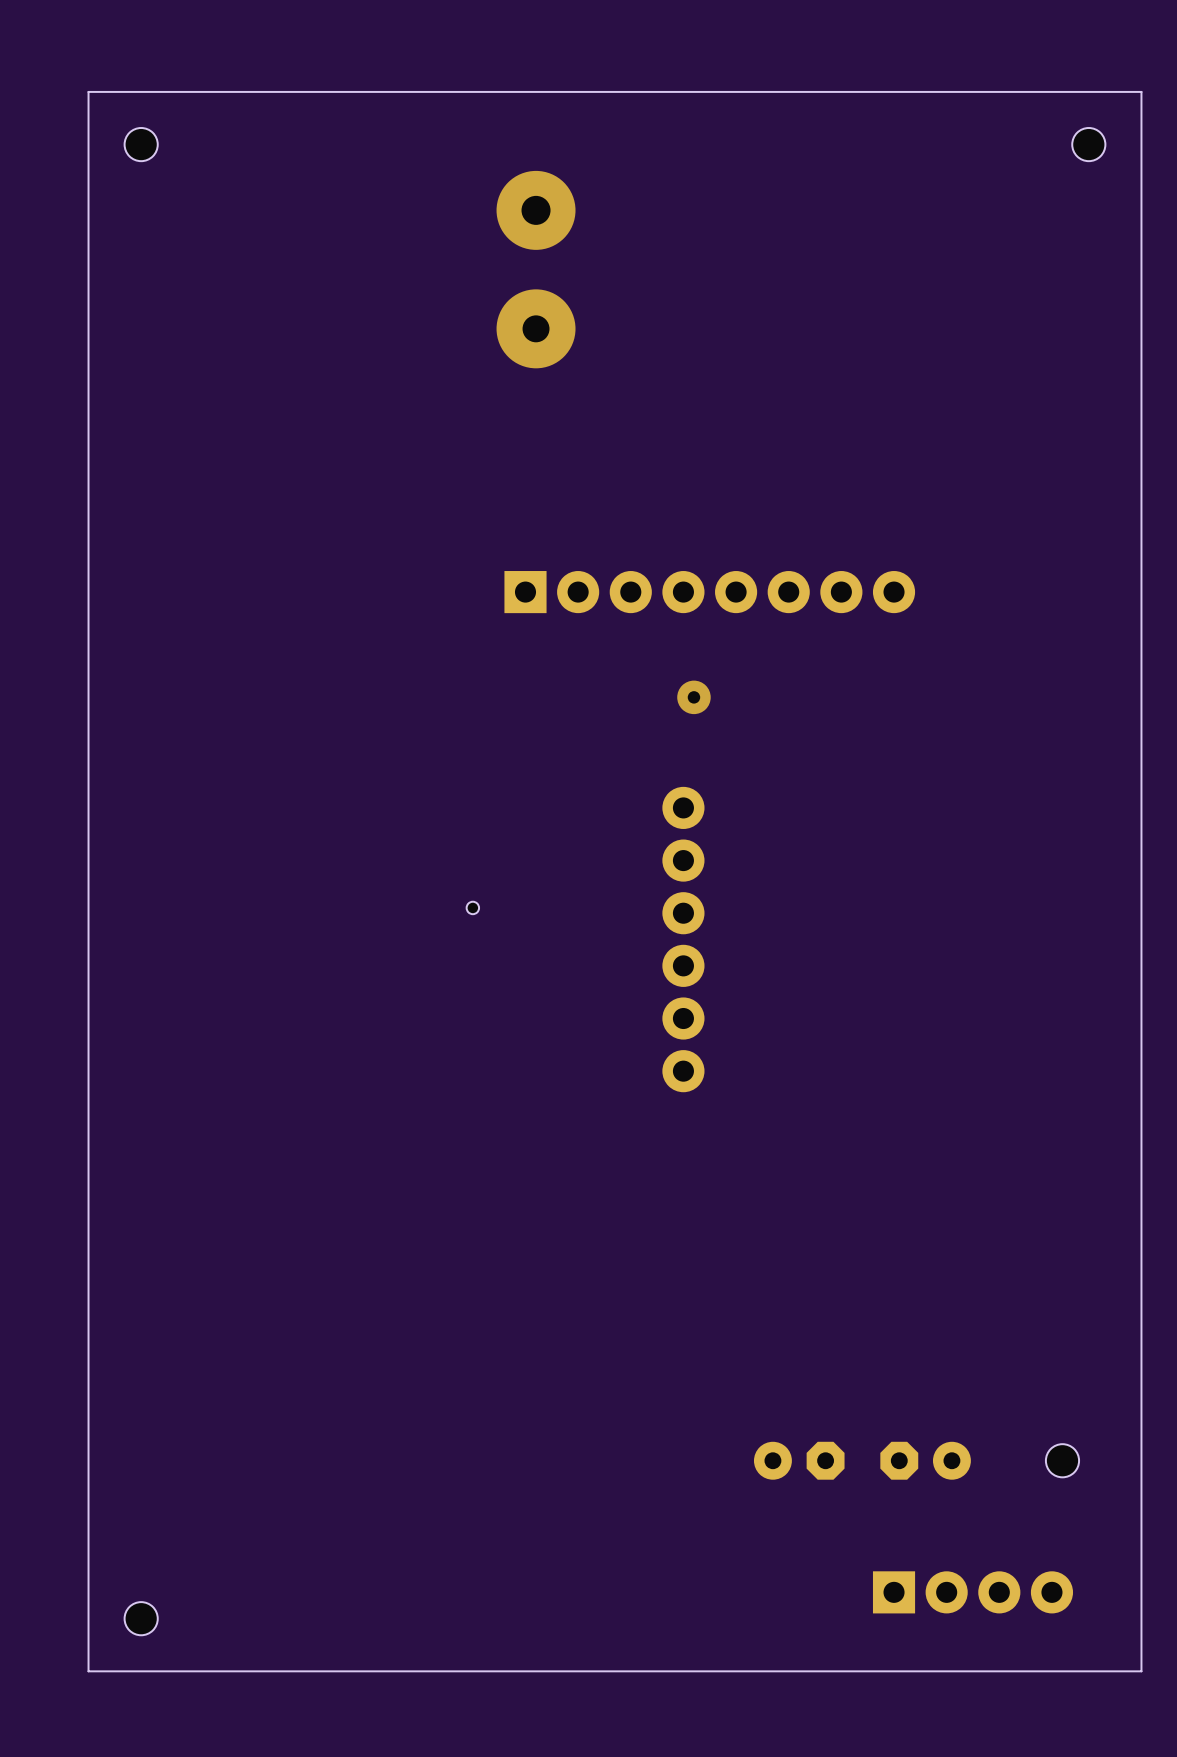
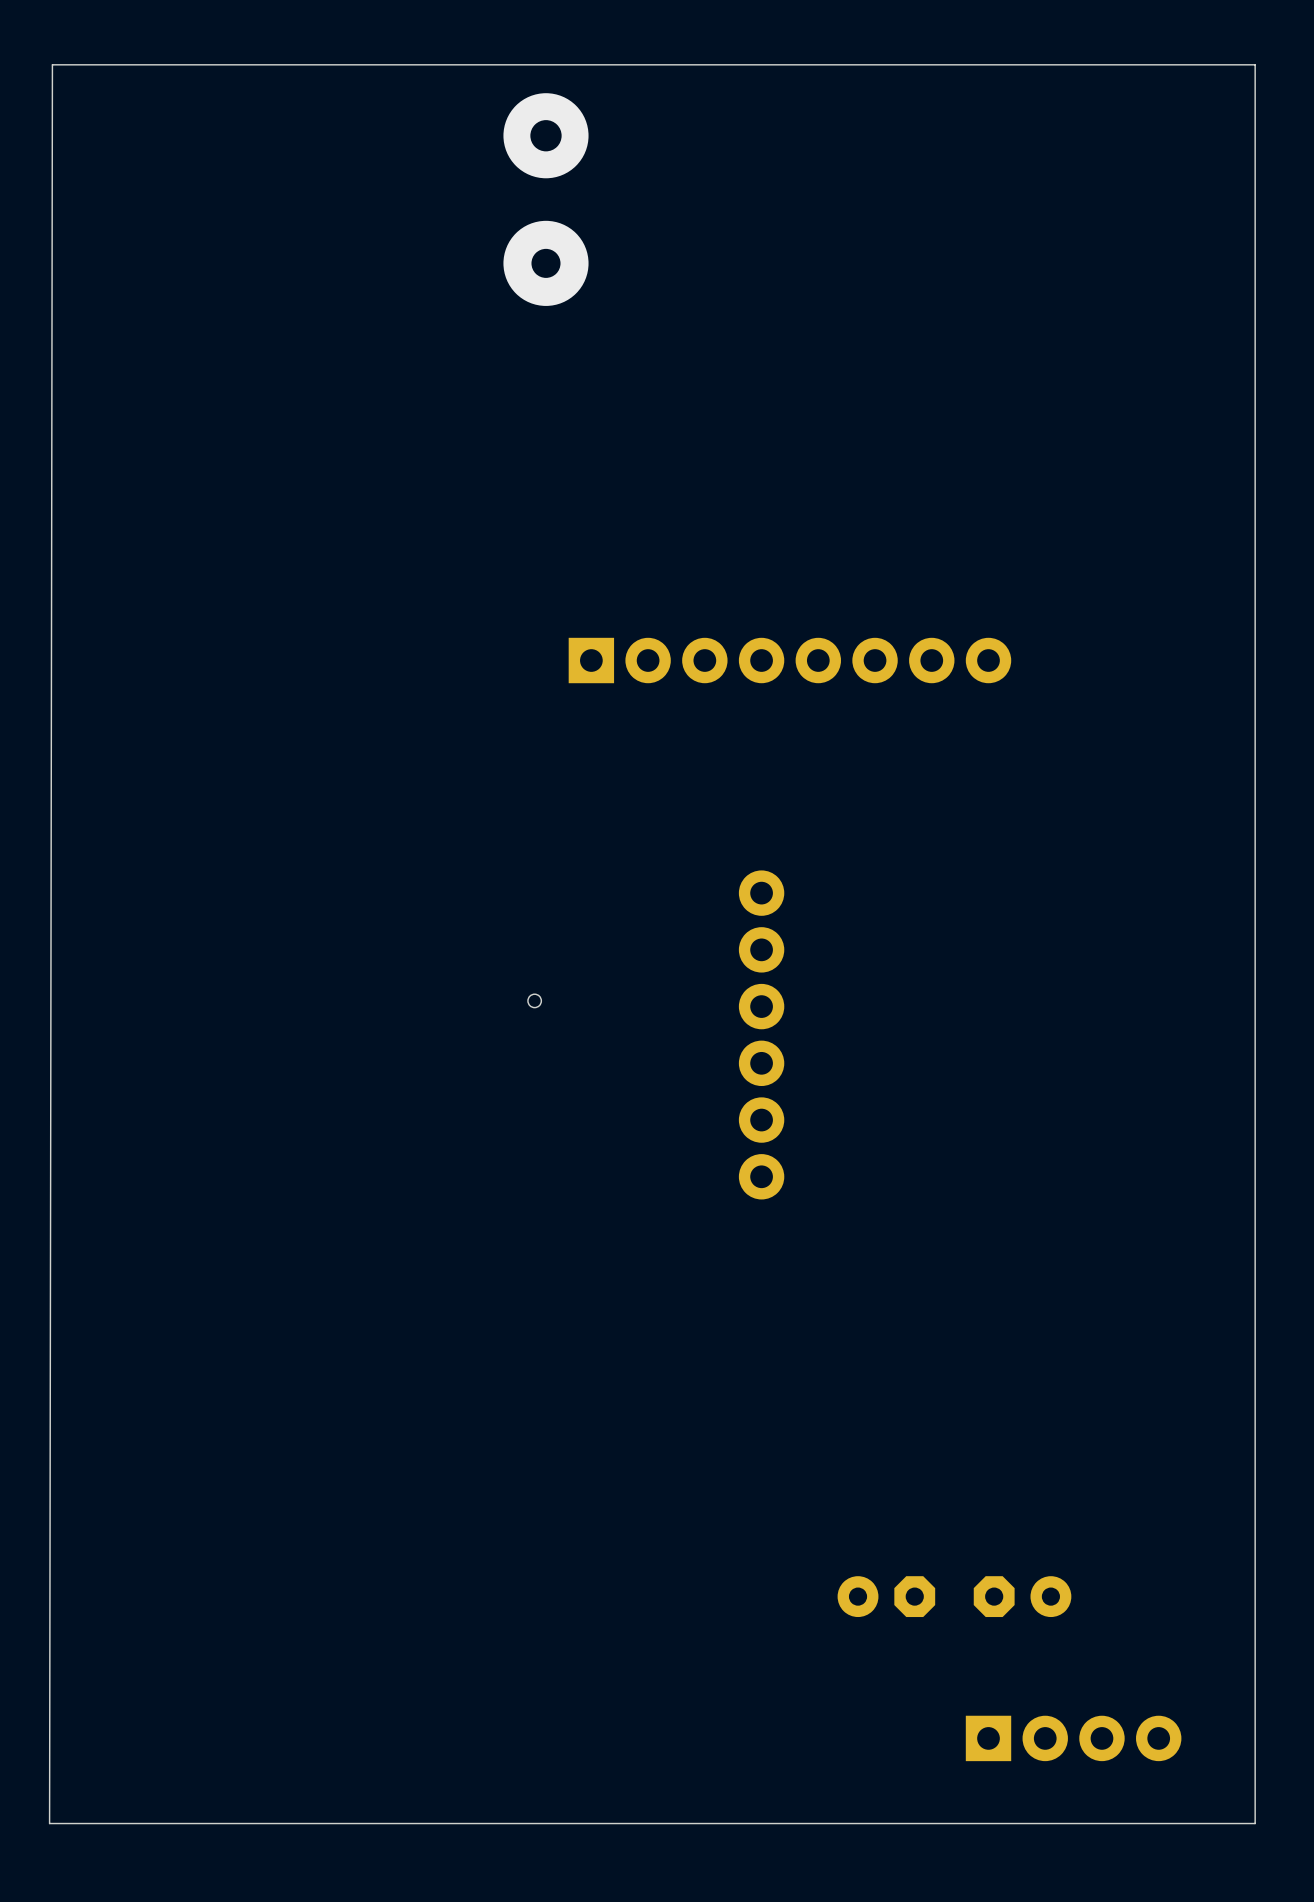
board edge: (1141, 91) (88, 91) (88, 1671) -> (1255, 121) (1255, 64) (52, 64) (49, 1823) (120, 1823)
hole: (141, 144) -> none
hole: (1088, 144) -> none
via position: (536, 210) -> (545, 135)
via position: (536, 328) -> (545, 263)
via: (693, 697) -> none
hole: (1062, 1460) -> none
hole: (141, 1618) -> none

